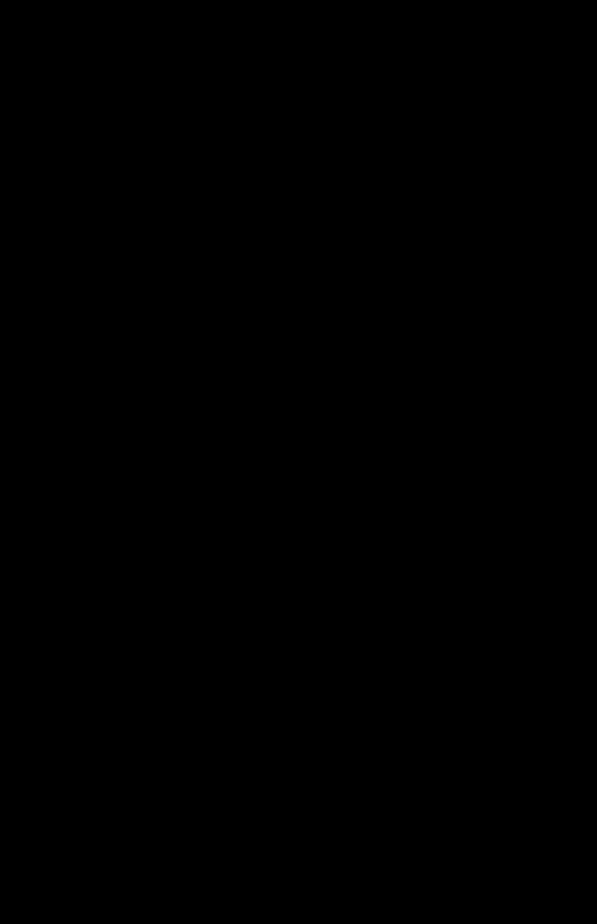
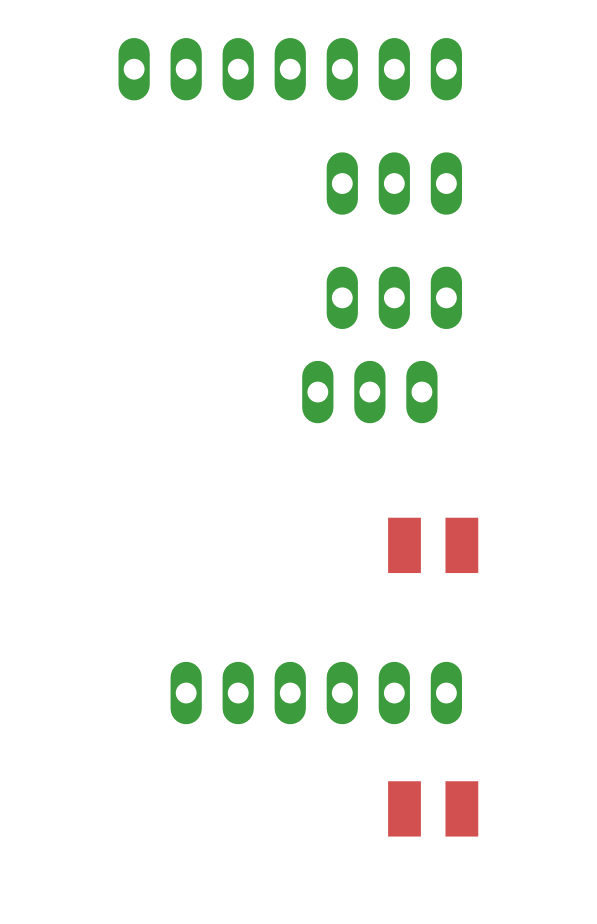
part: none -> (290, 69)
part: none -> (394, 183)
part: none -> (394, 297)
part: none -> (369, 392)
part: none -> (433, 545)
part: none -> (316, 693)
part: none -> (433, 808)

